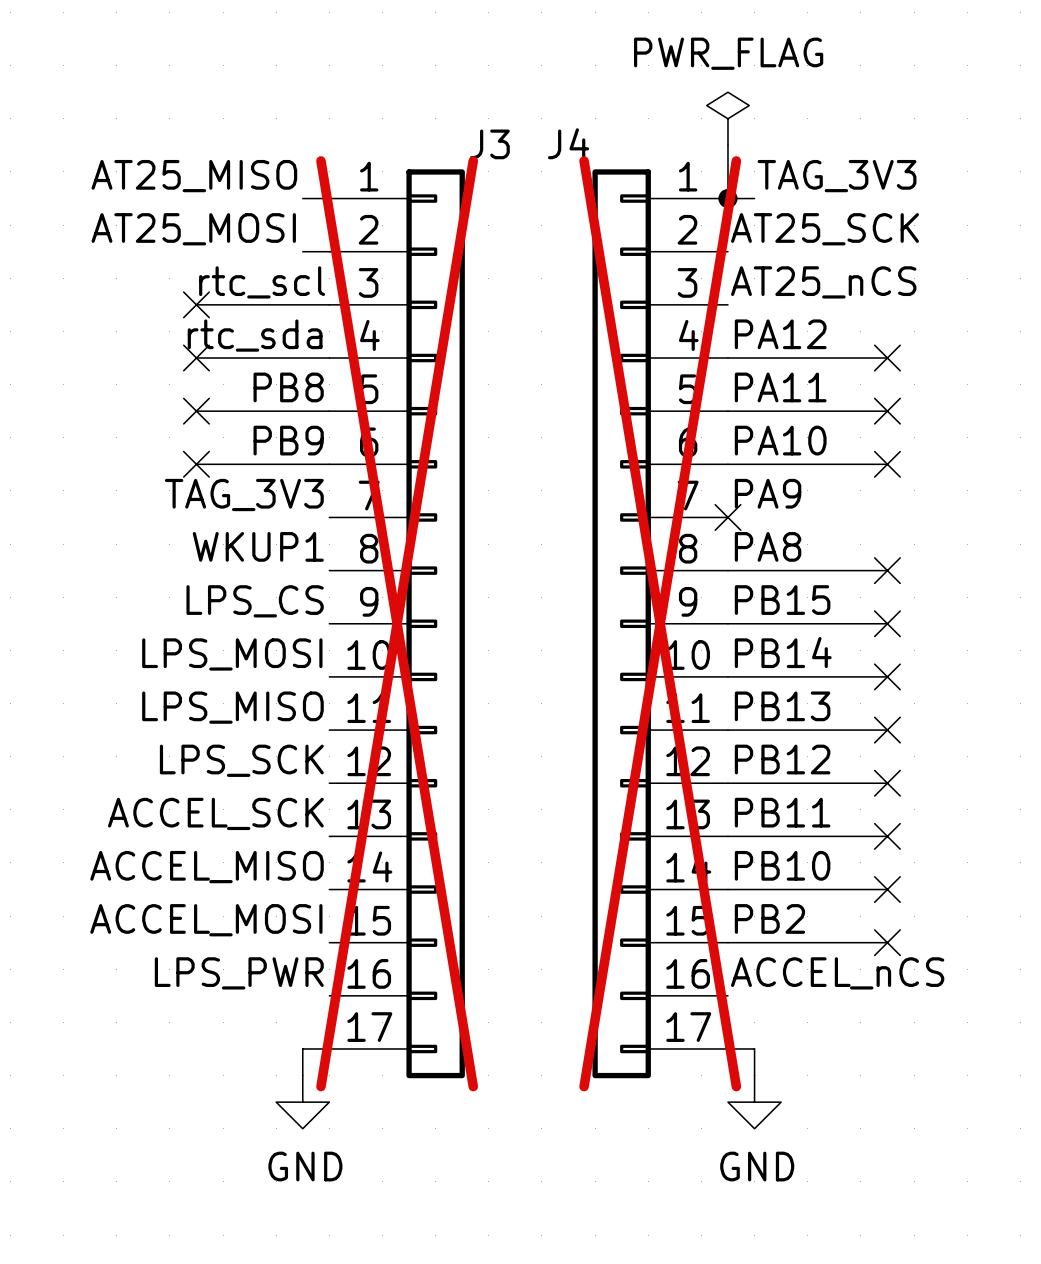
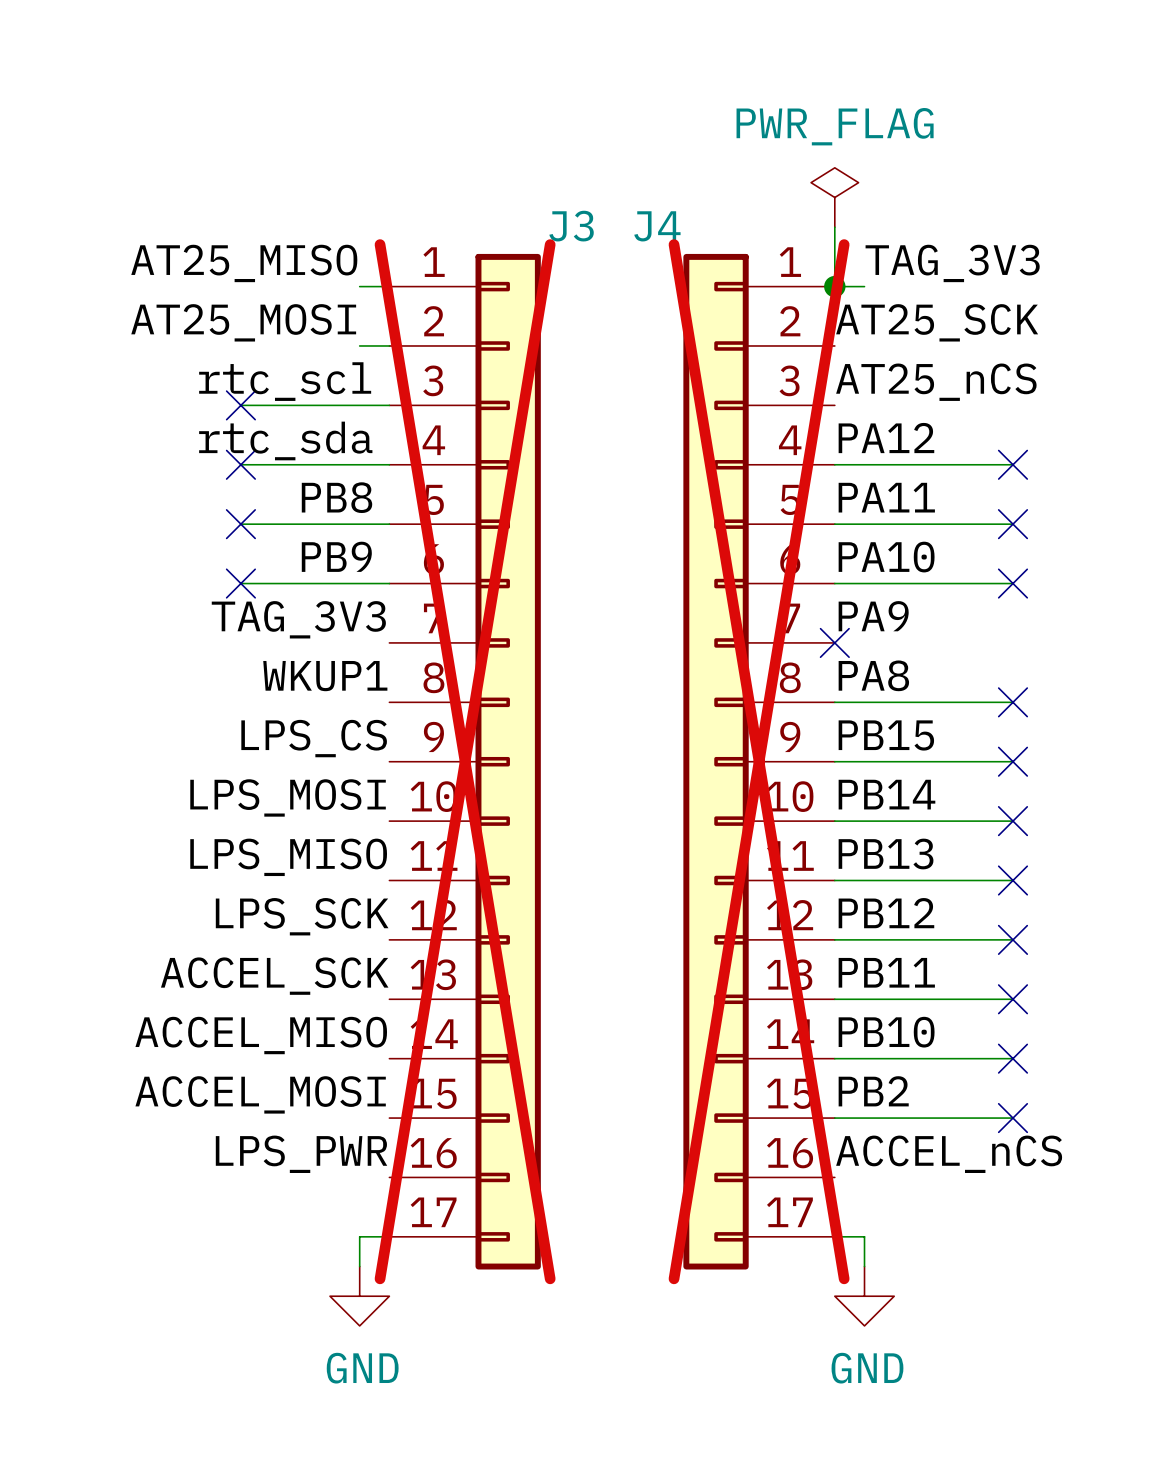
label position: rtc_scl (262, 282) -> rtc_scl (285, 381)
label position: rtc_sda (255, 335) -> rtc_sda (285, 440)
label position: PB8 (288, 387) -> PB8 (337, 497)
label position: PB9 (288, 440) -> PB9 (336, 556)

